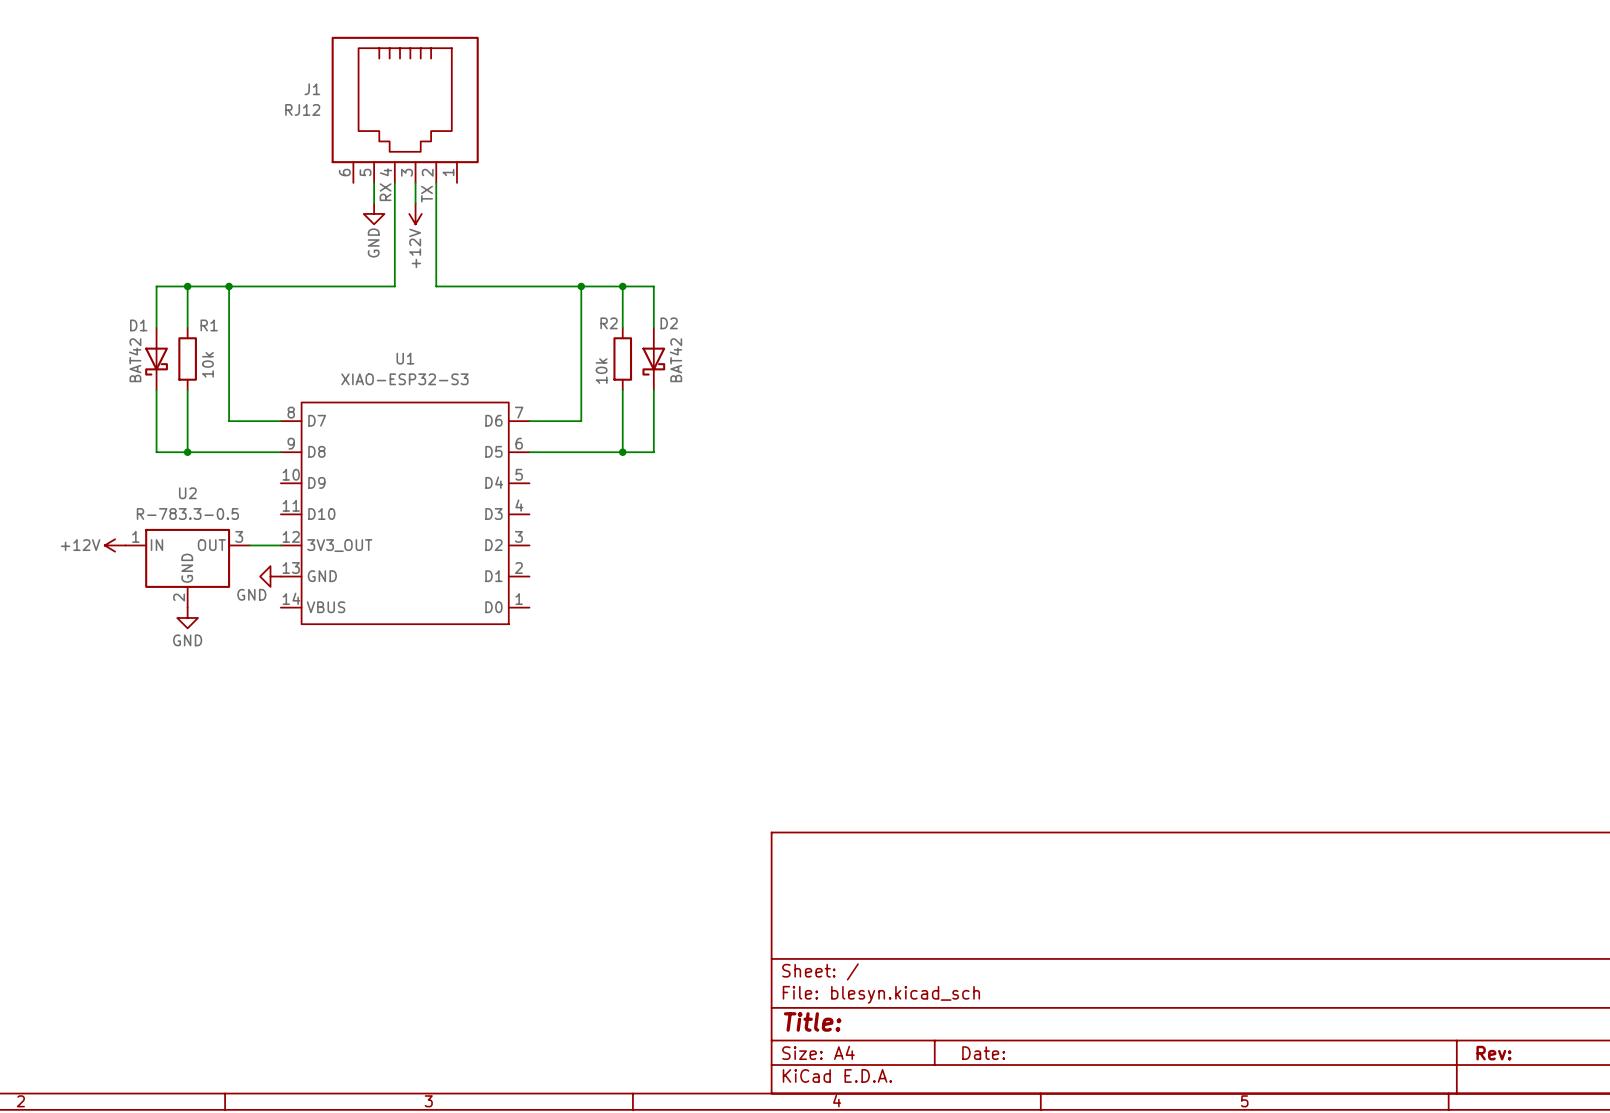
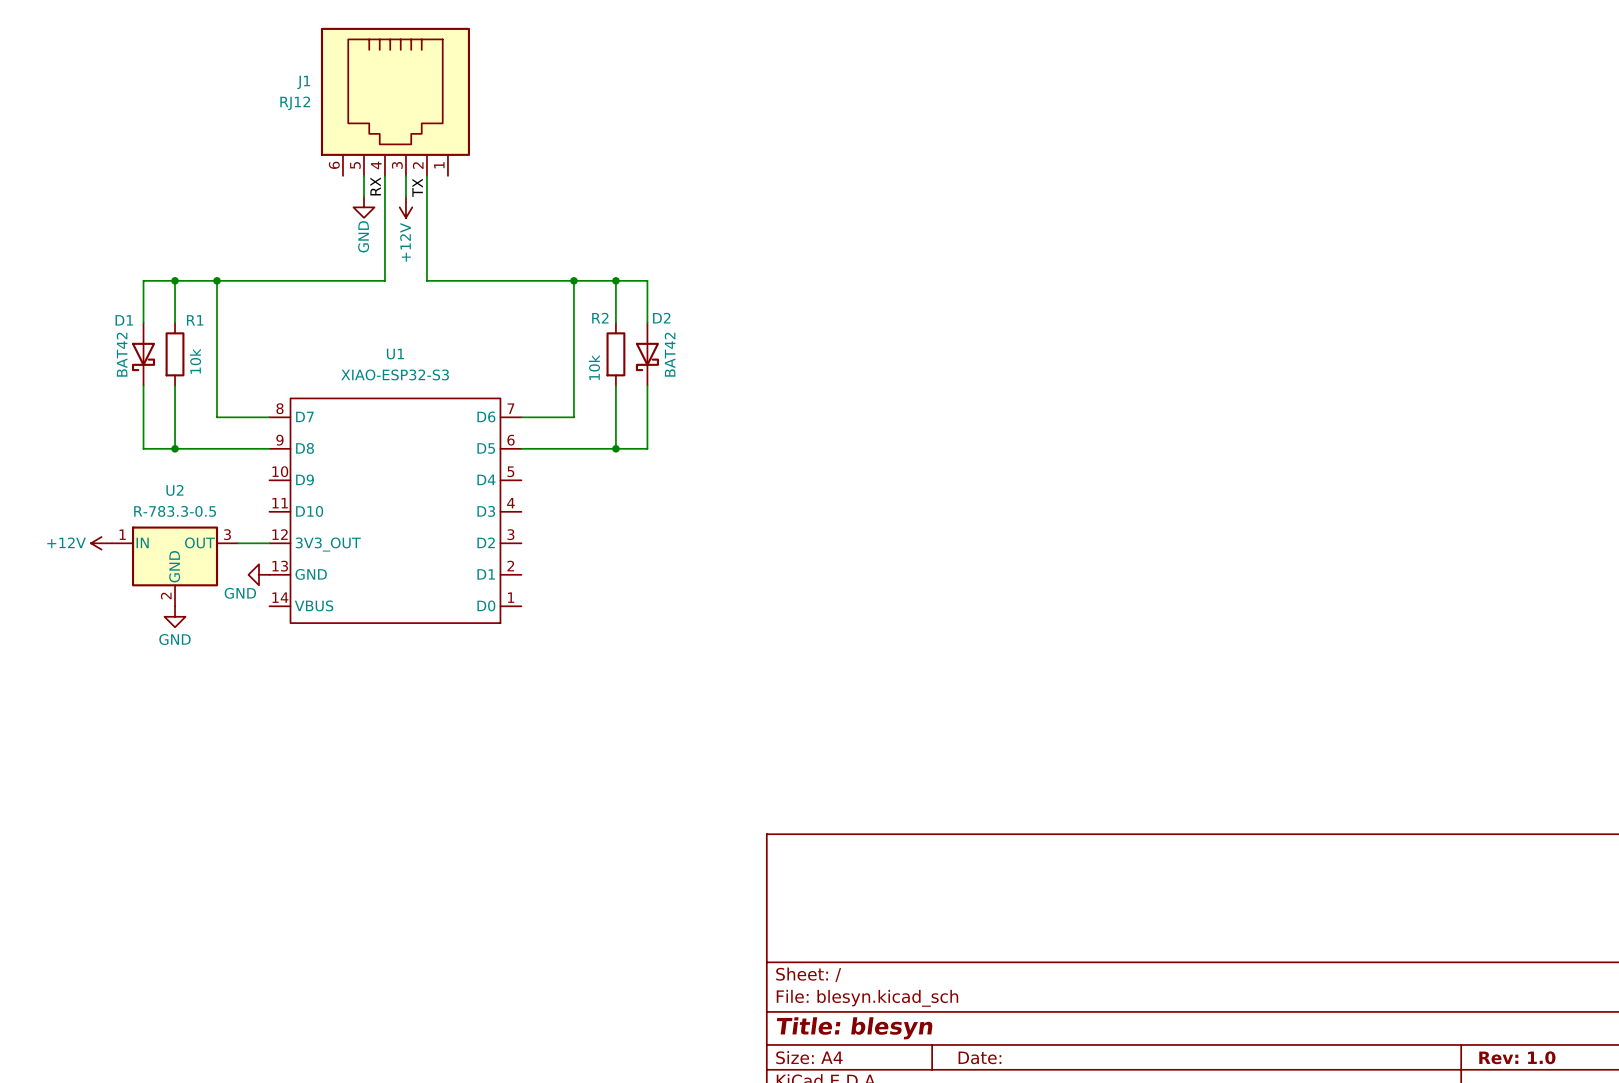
title block: Title: (812, 1021) -> Title: blesyn (854, 1028)
title block: Rev: (1493, 1053) -> Rev: 1.0 (1517, 1057)

